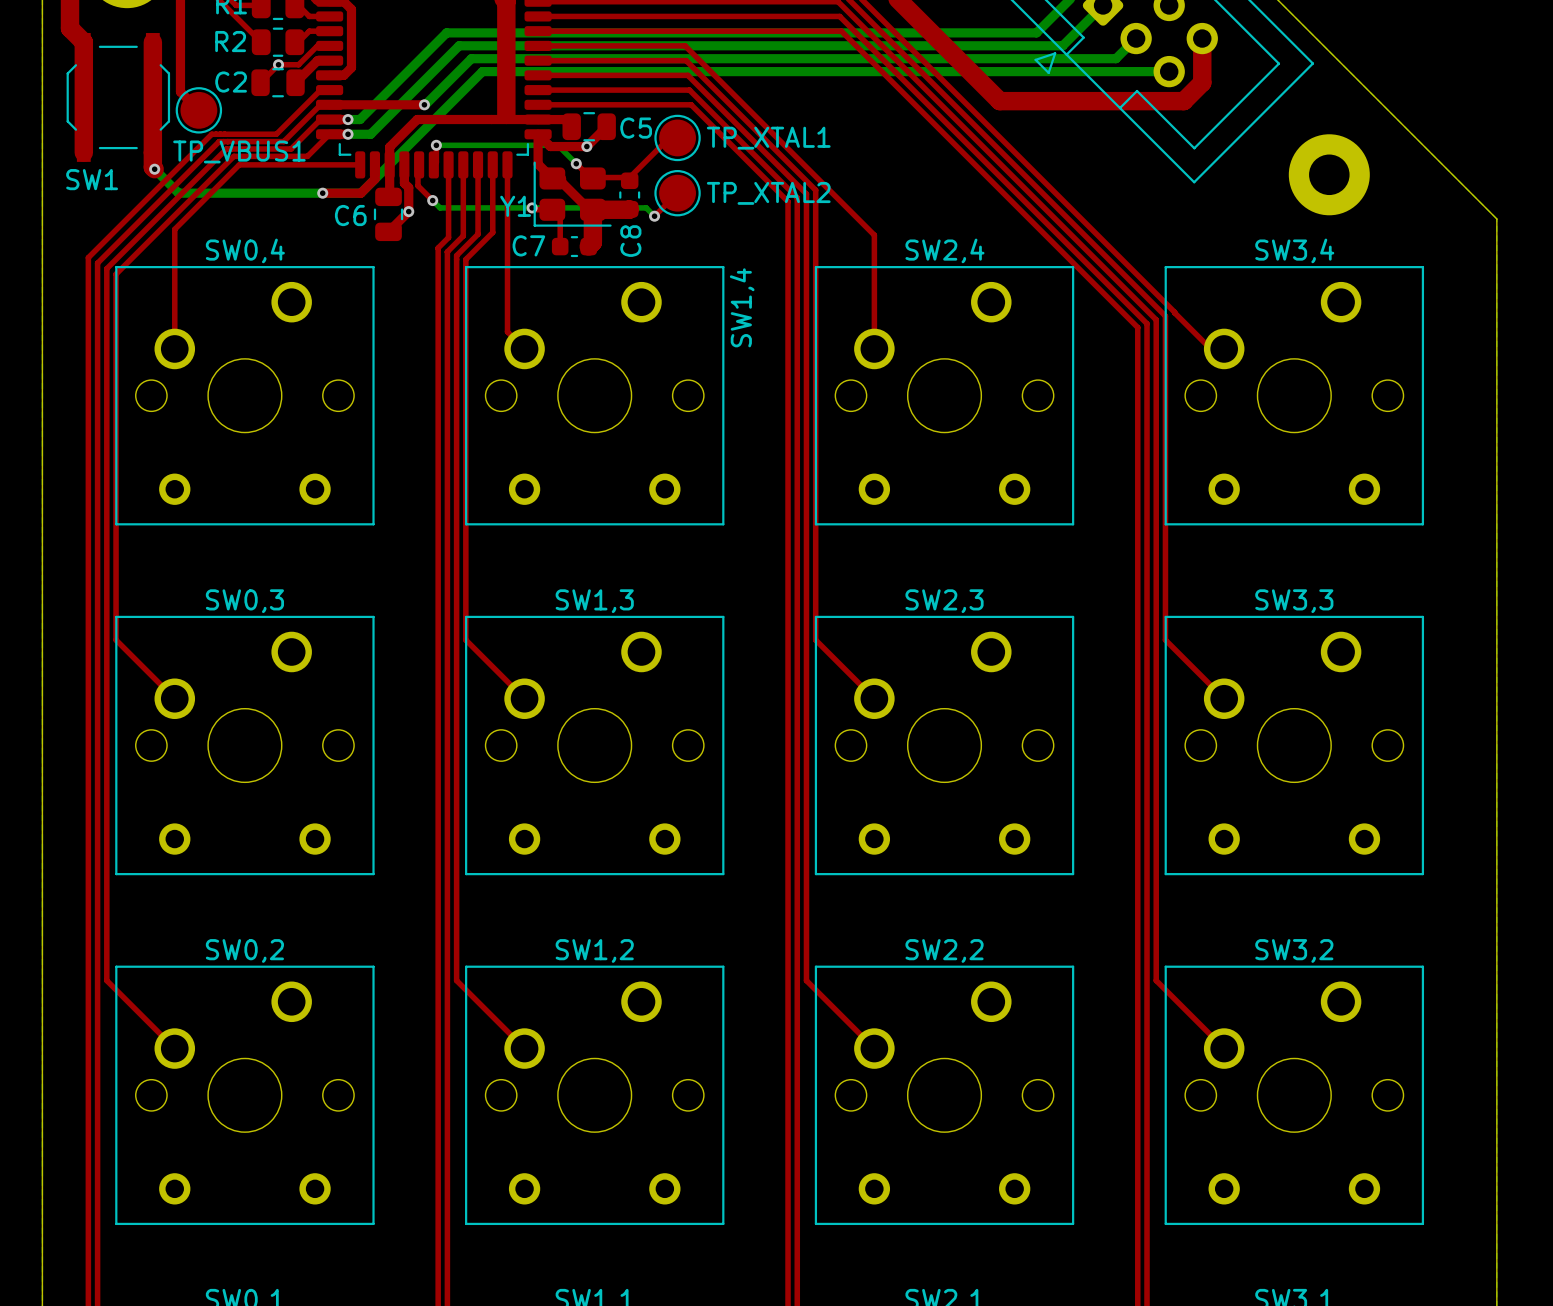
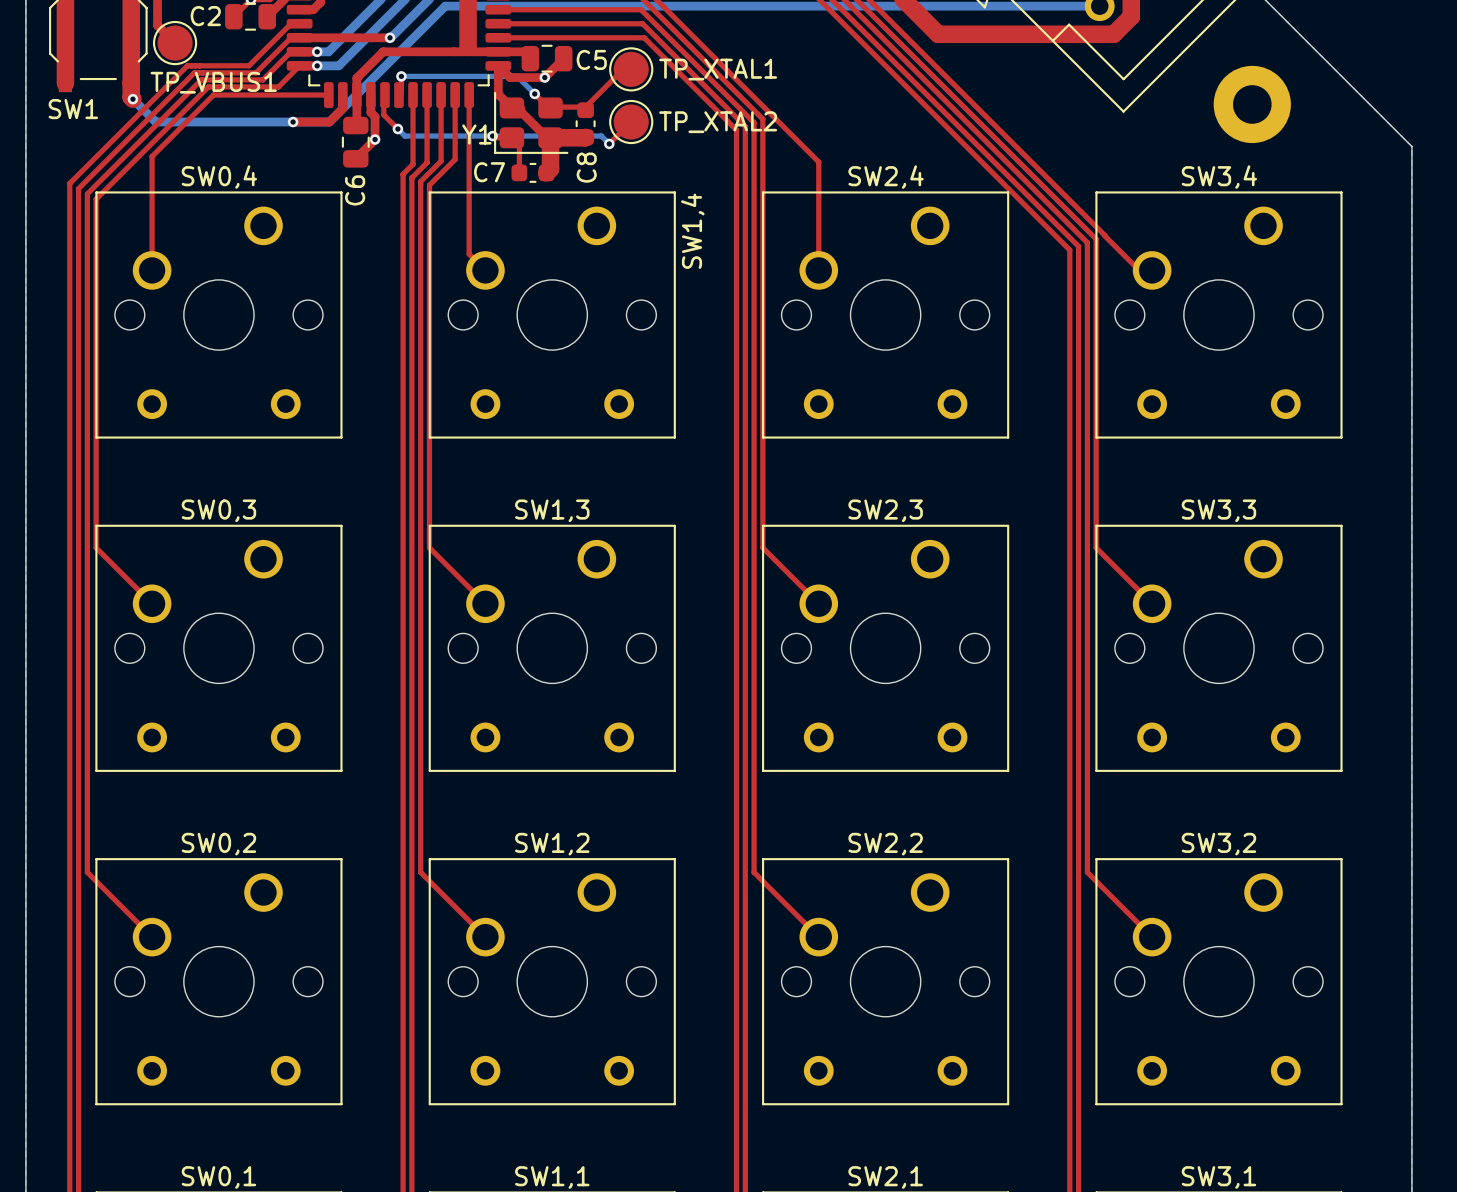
C6 name rotation: 0° (350, 215) -> 90° counterclockwise (355, 190)
C6 name position: C6 (350, 215) -> C6 (355, 190)

